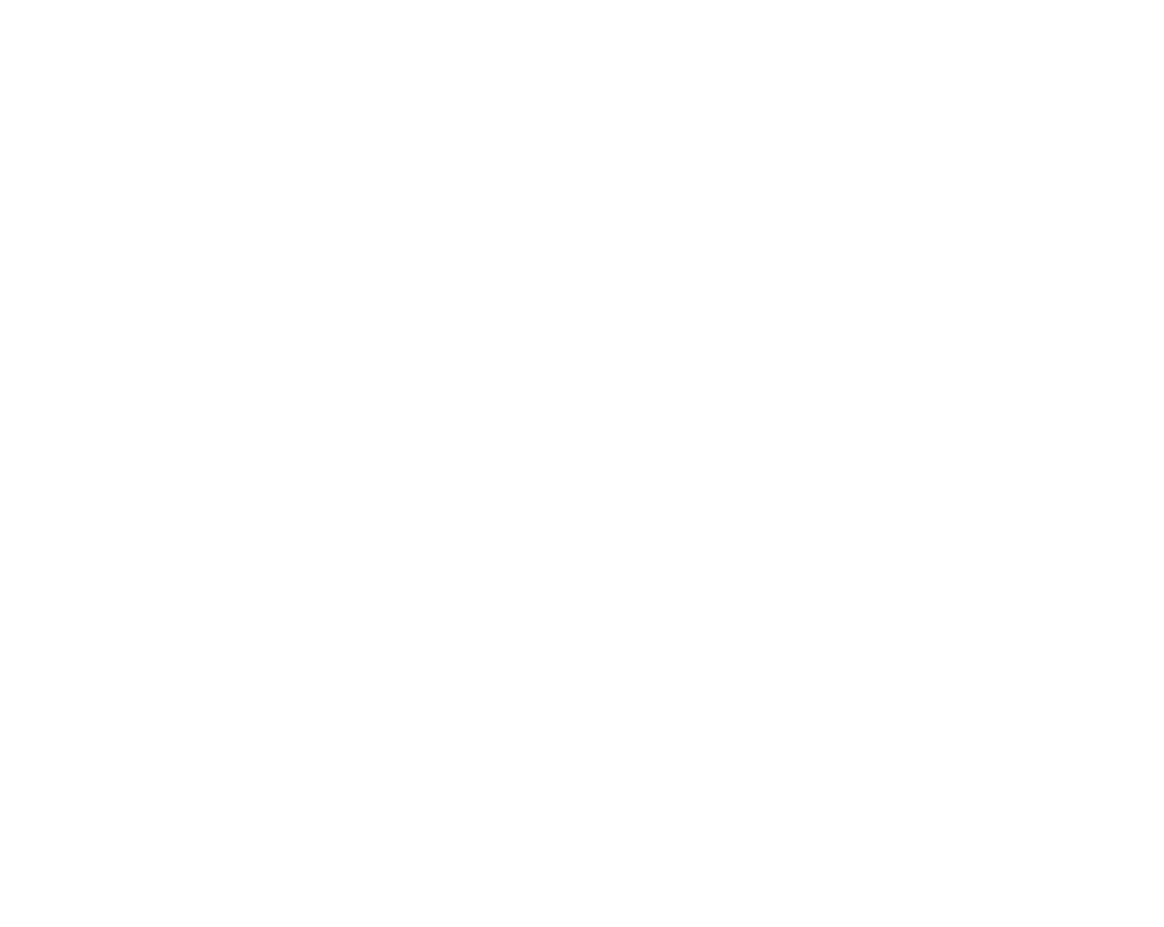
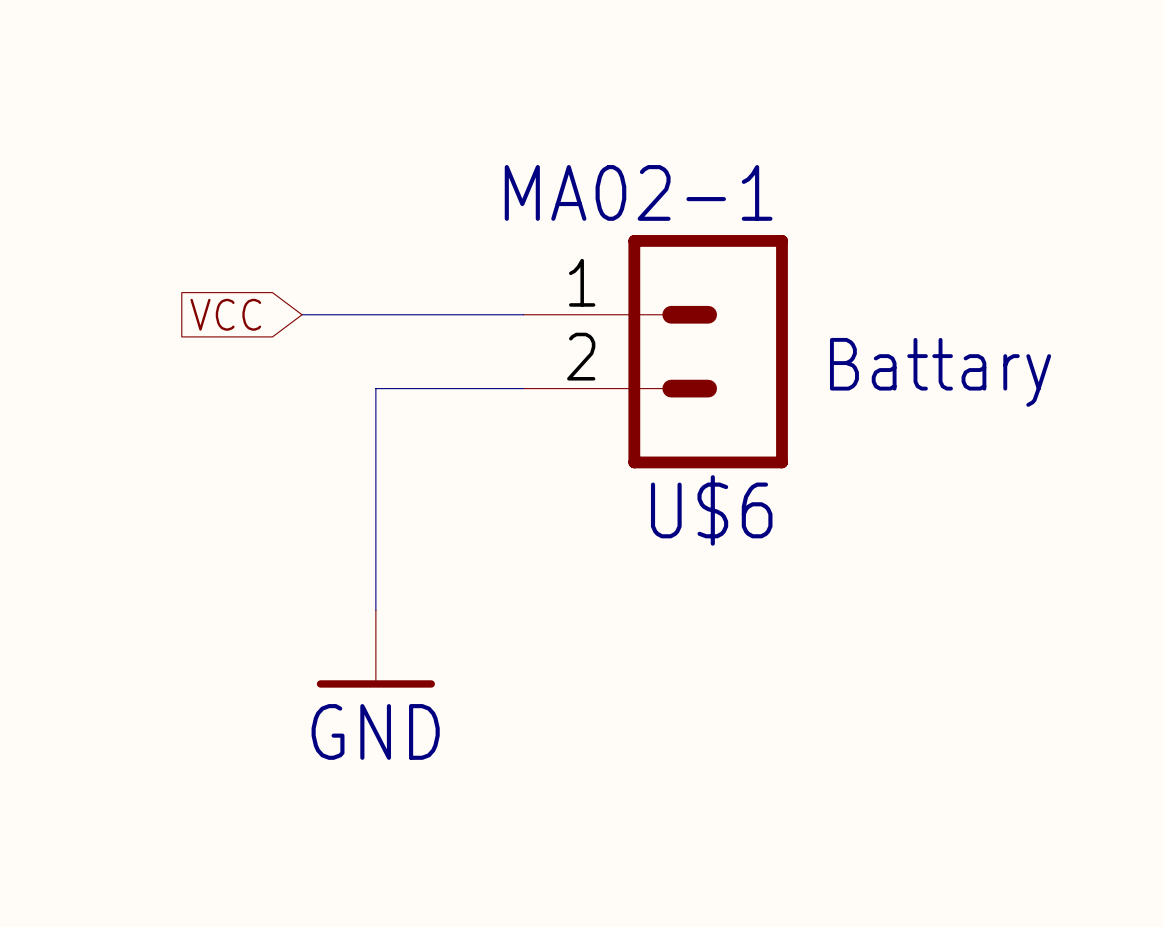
global label: none -> VCC (225, 314)
wire: none -> (302, 314) (523, 314)
U$6: none -> MA02-1 (655, 351)
text: none -> Battary (940, 372)
wire: none -> (523, 388) (375, 388) (375, 610)
power symbol: none -> GND (375, 648)

